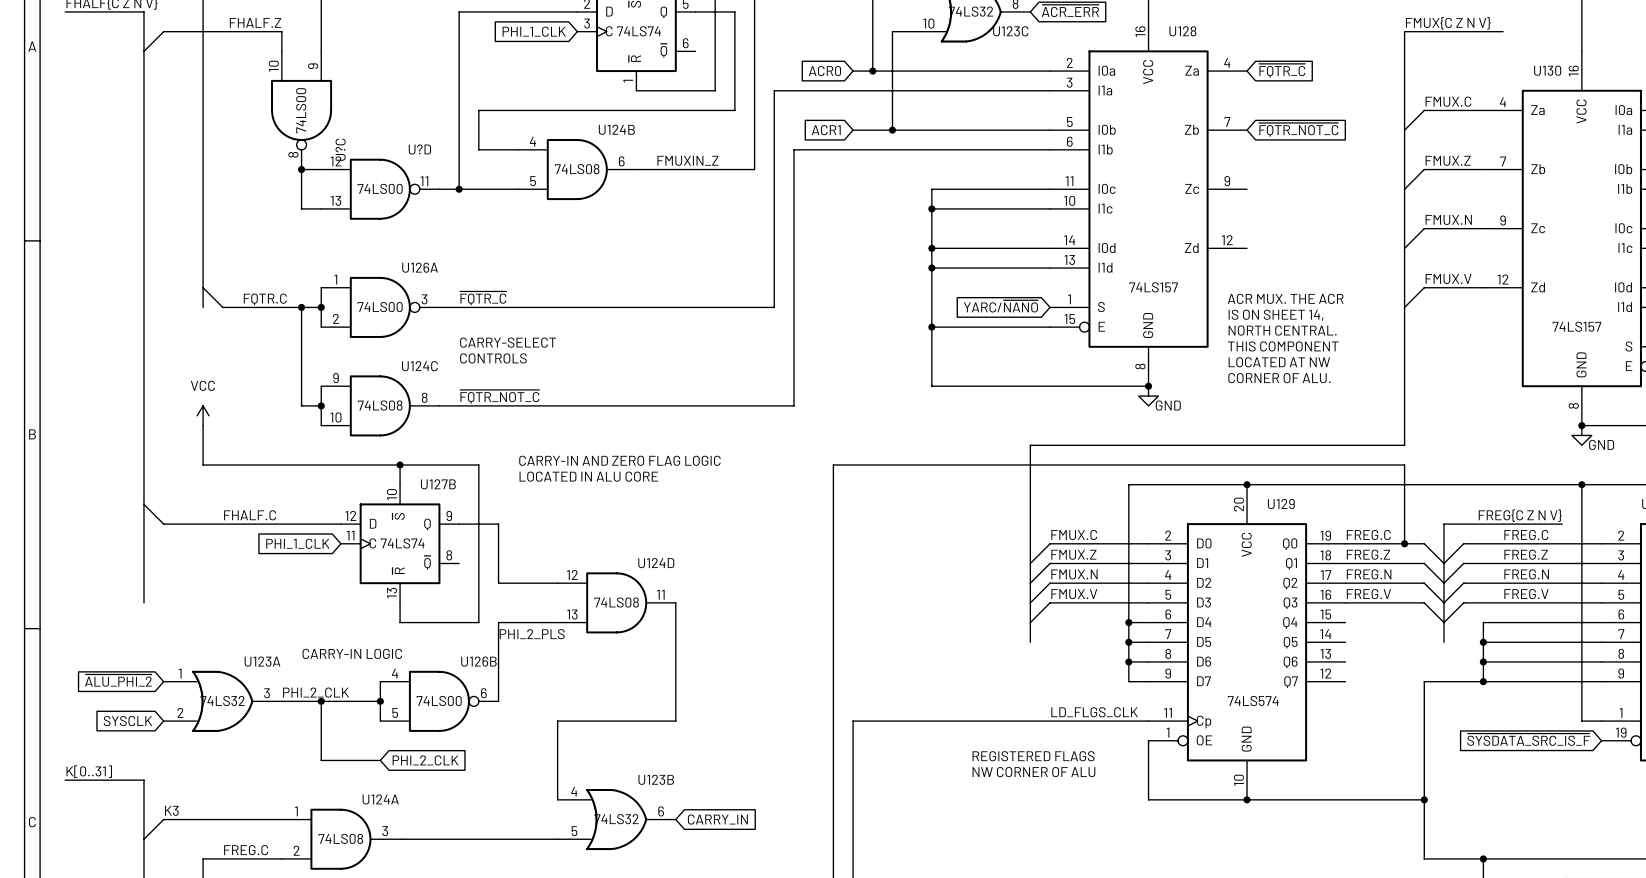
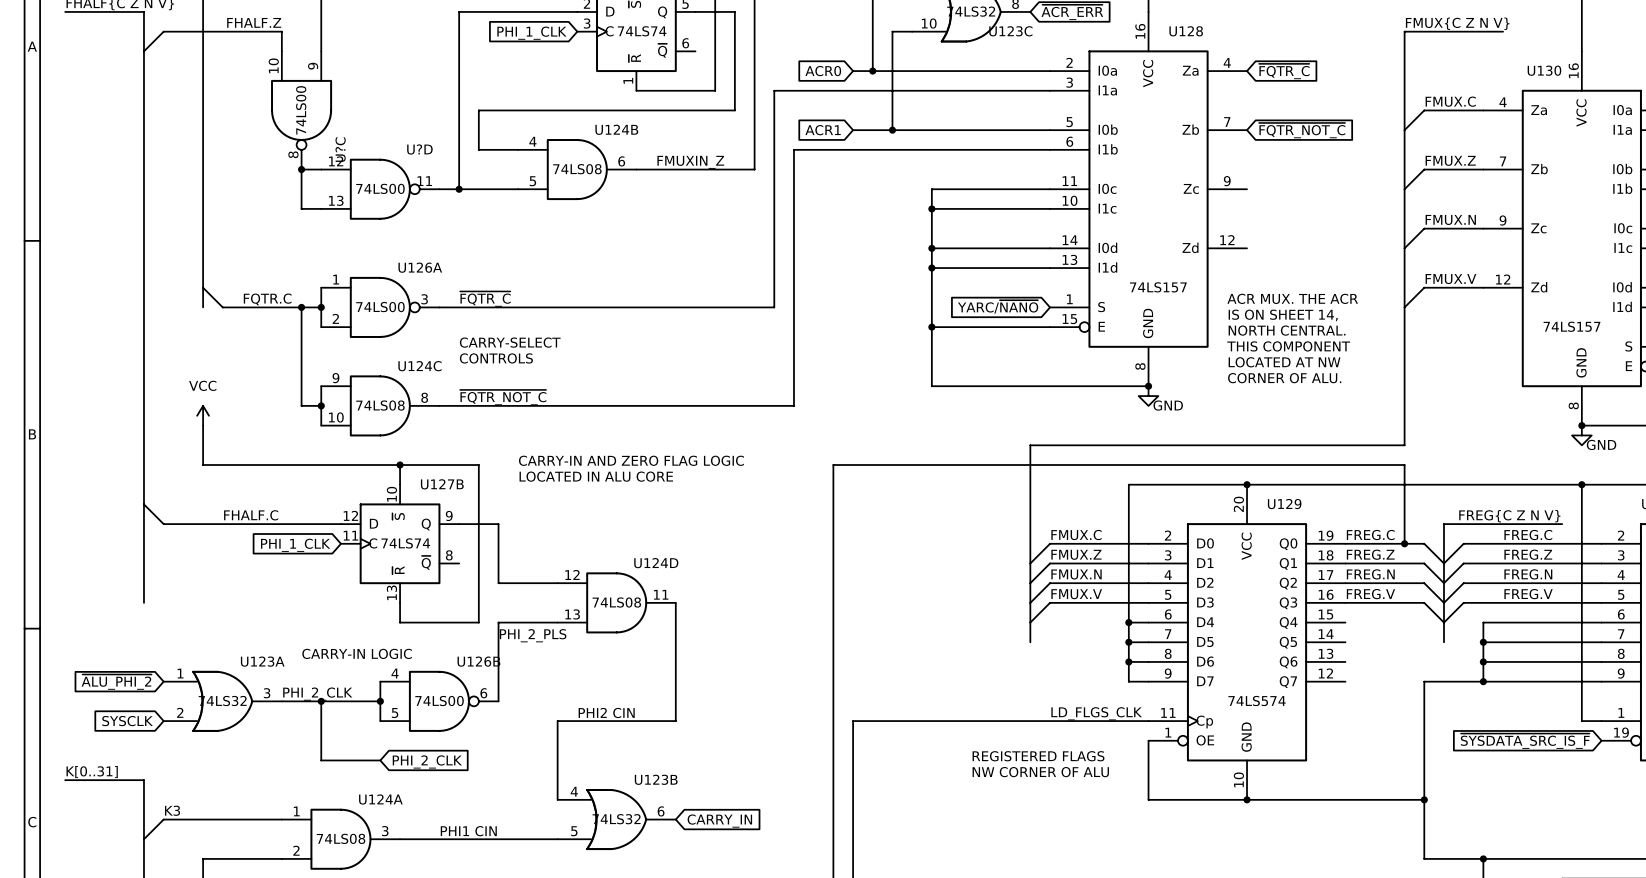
text: none -> PHI2 CIN (606, 713)
text: none -> PHI1 CIN (468, 831)
label: FREG.C (246, 850) -> none

